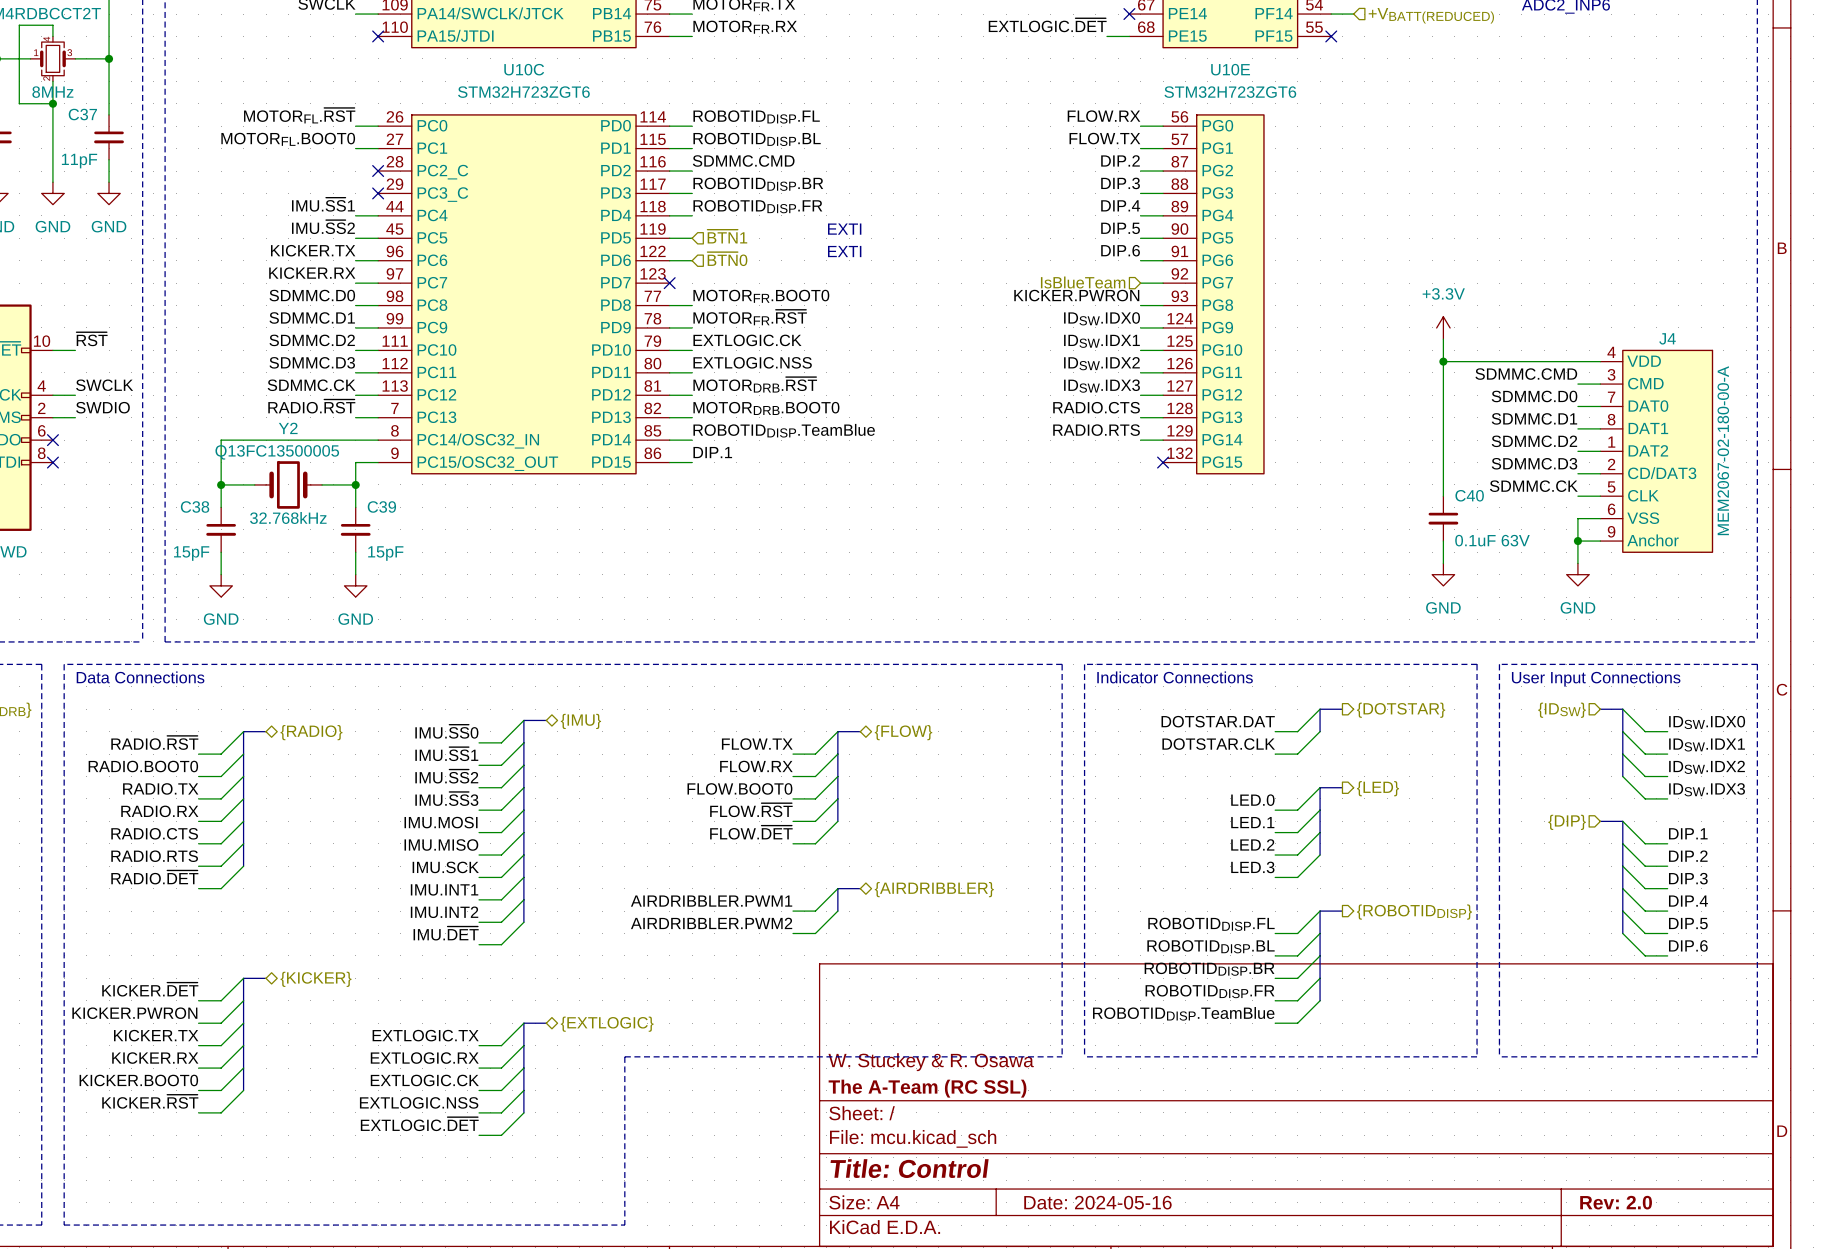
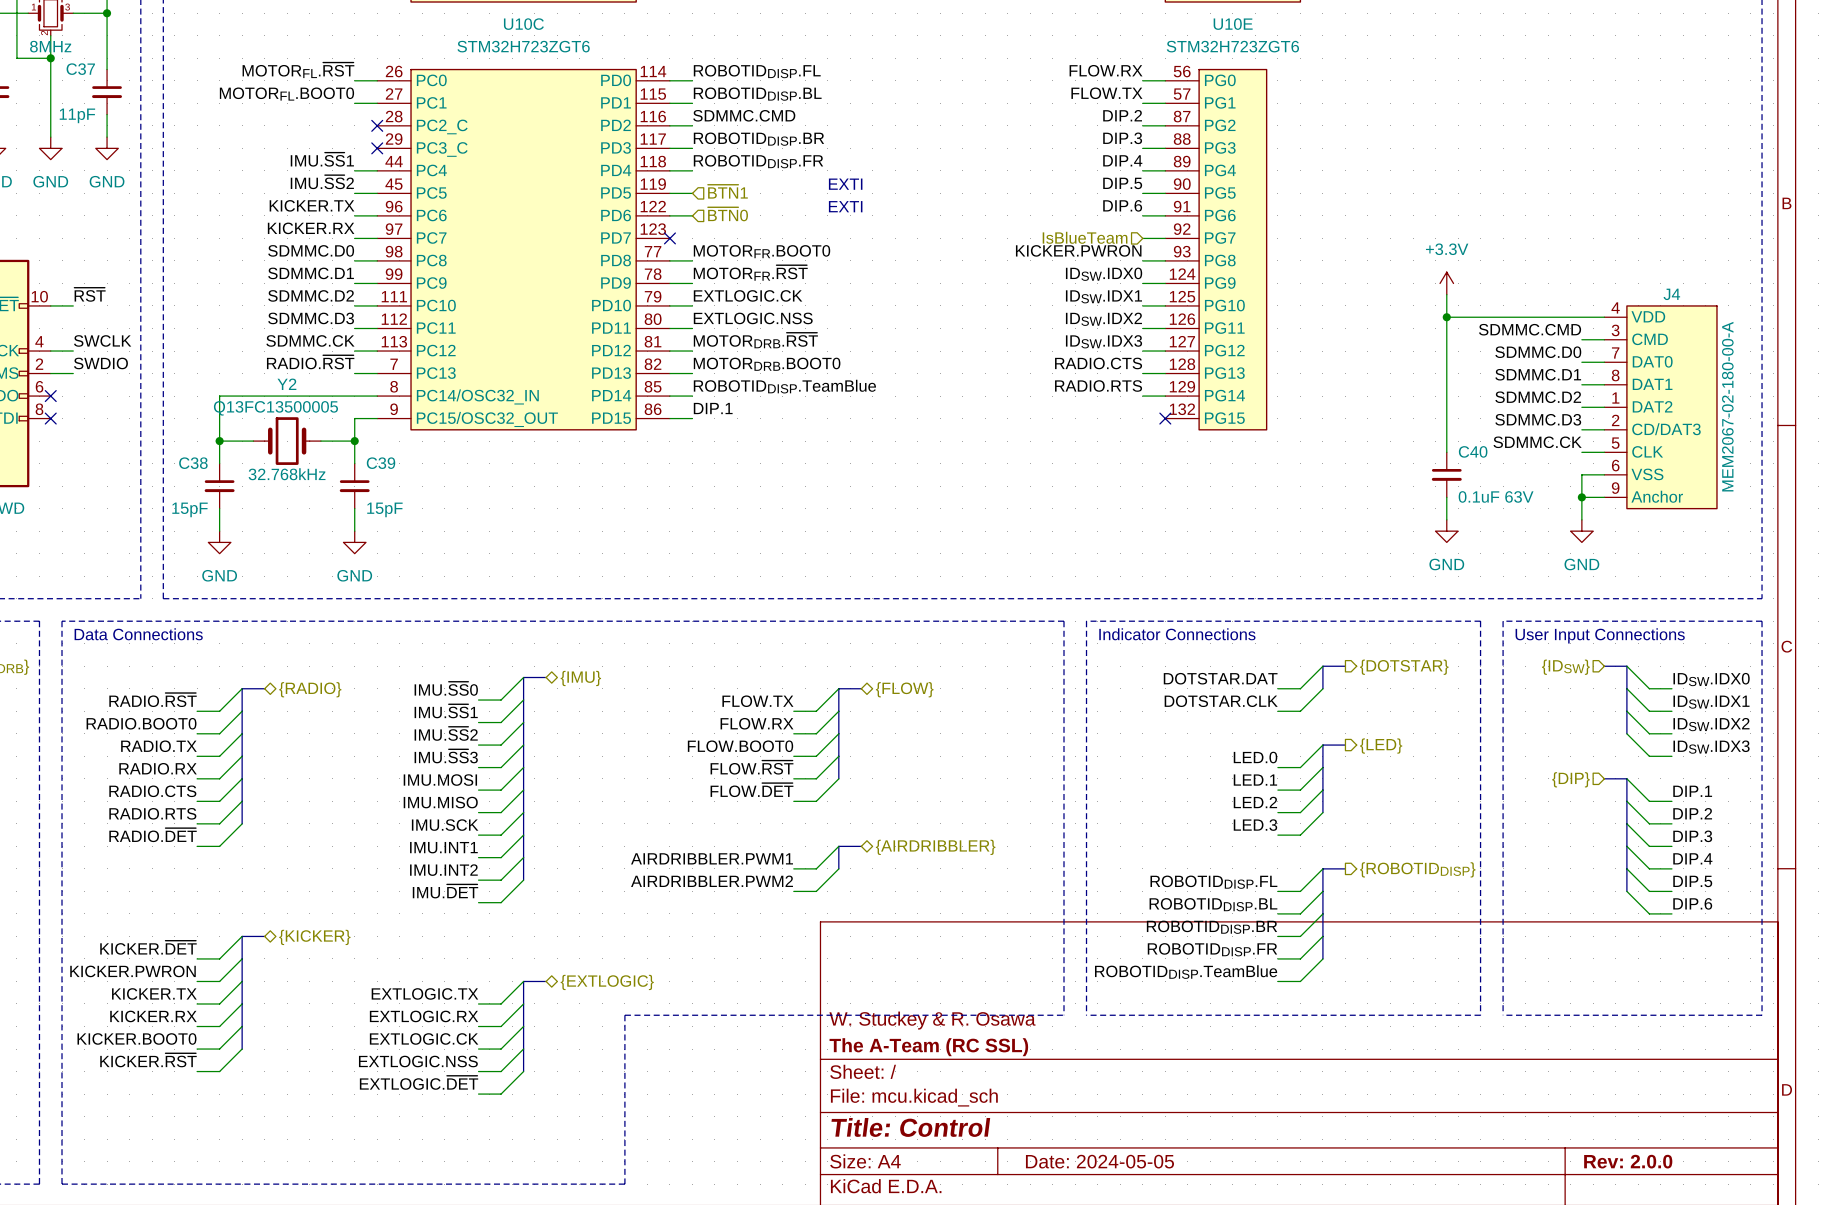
title block: Date: 2024-05-16 (1097, 1202) -> Date: 2024-05-05 (1099, 1161)
title block: Rev: 2.0 (1616, 1202) -> Rev: 2.0.0 (1628, 1161)

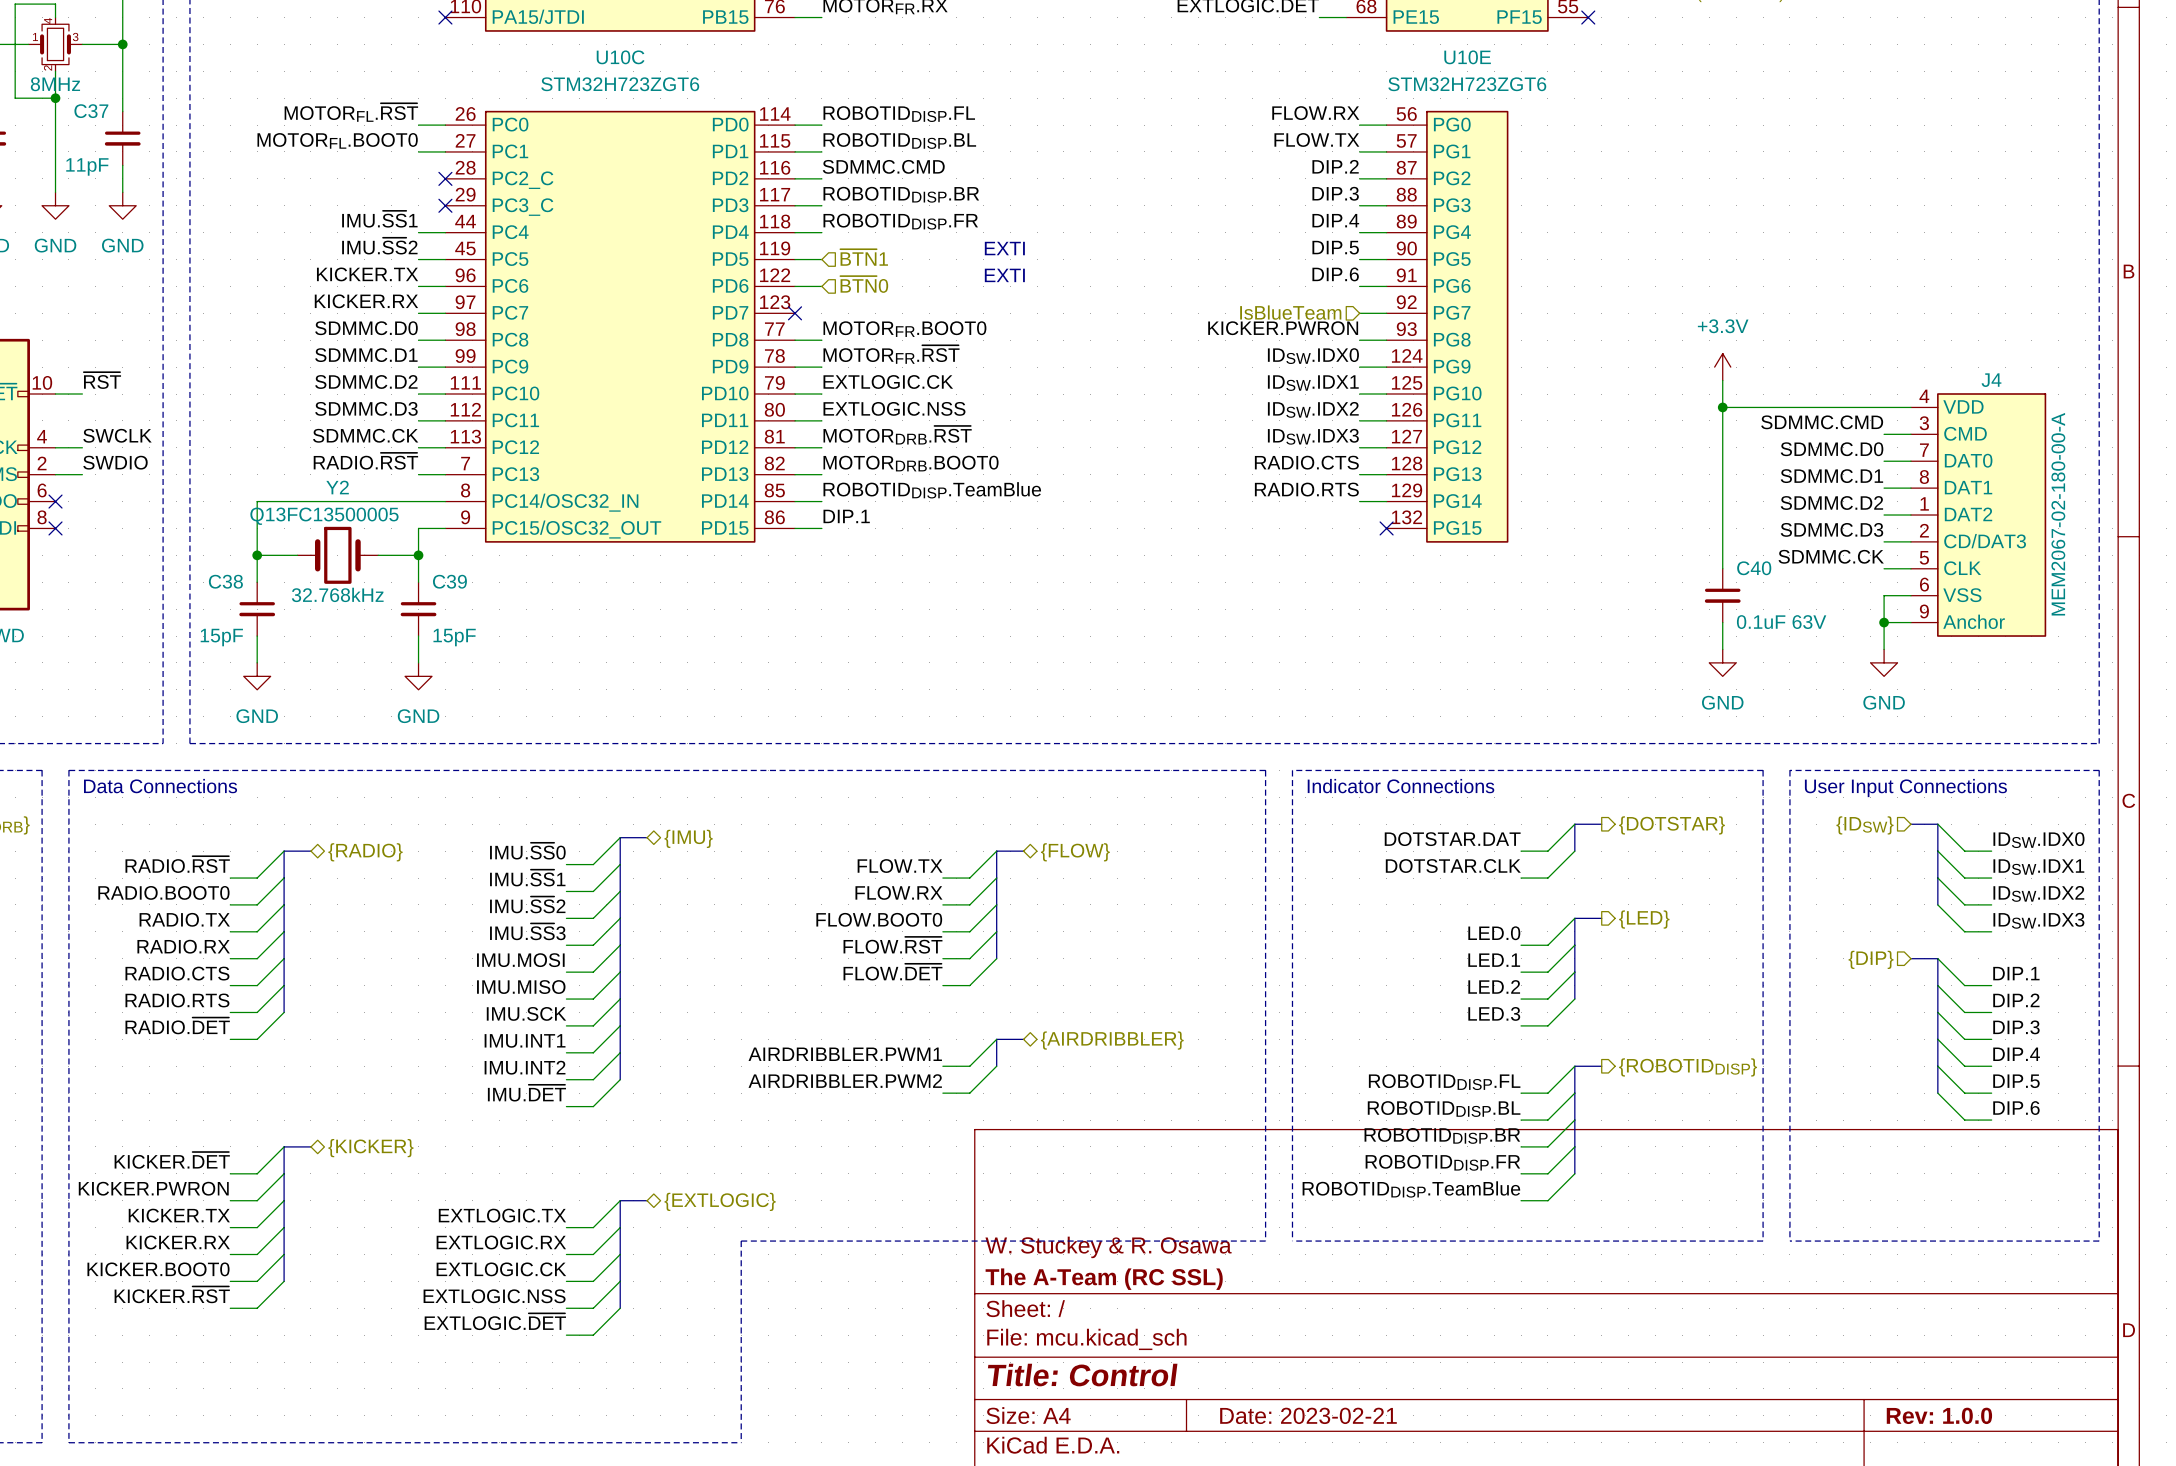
title block: Date: 2024-05-05 (1099, 1161) -> Date: 2023-02-21 (1308, 1415)
title block: Rev: 2.0.0 (1628, 1161) -> Rev: 1.0.0 (1939, 1415)

